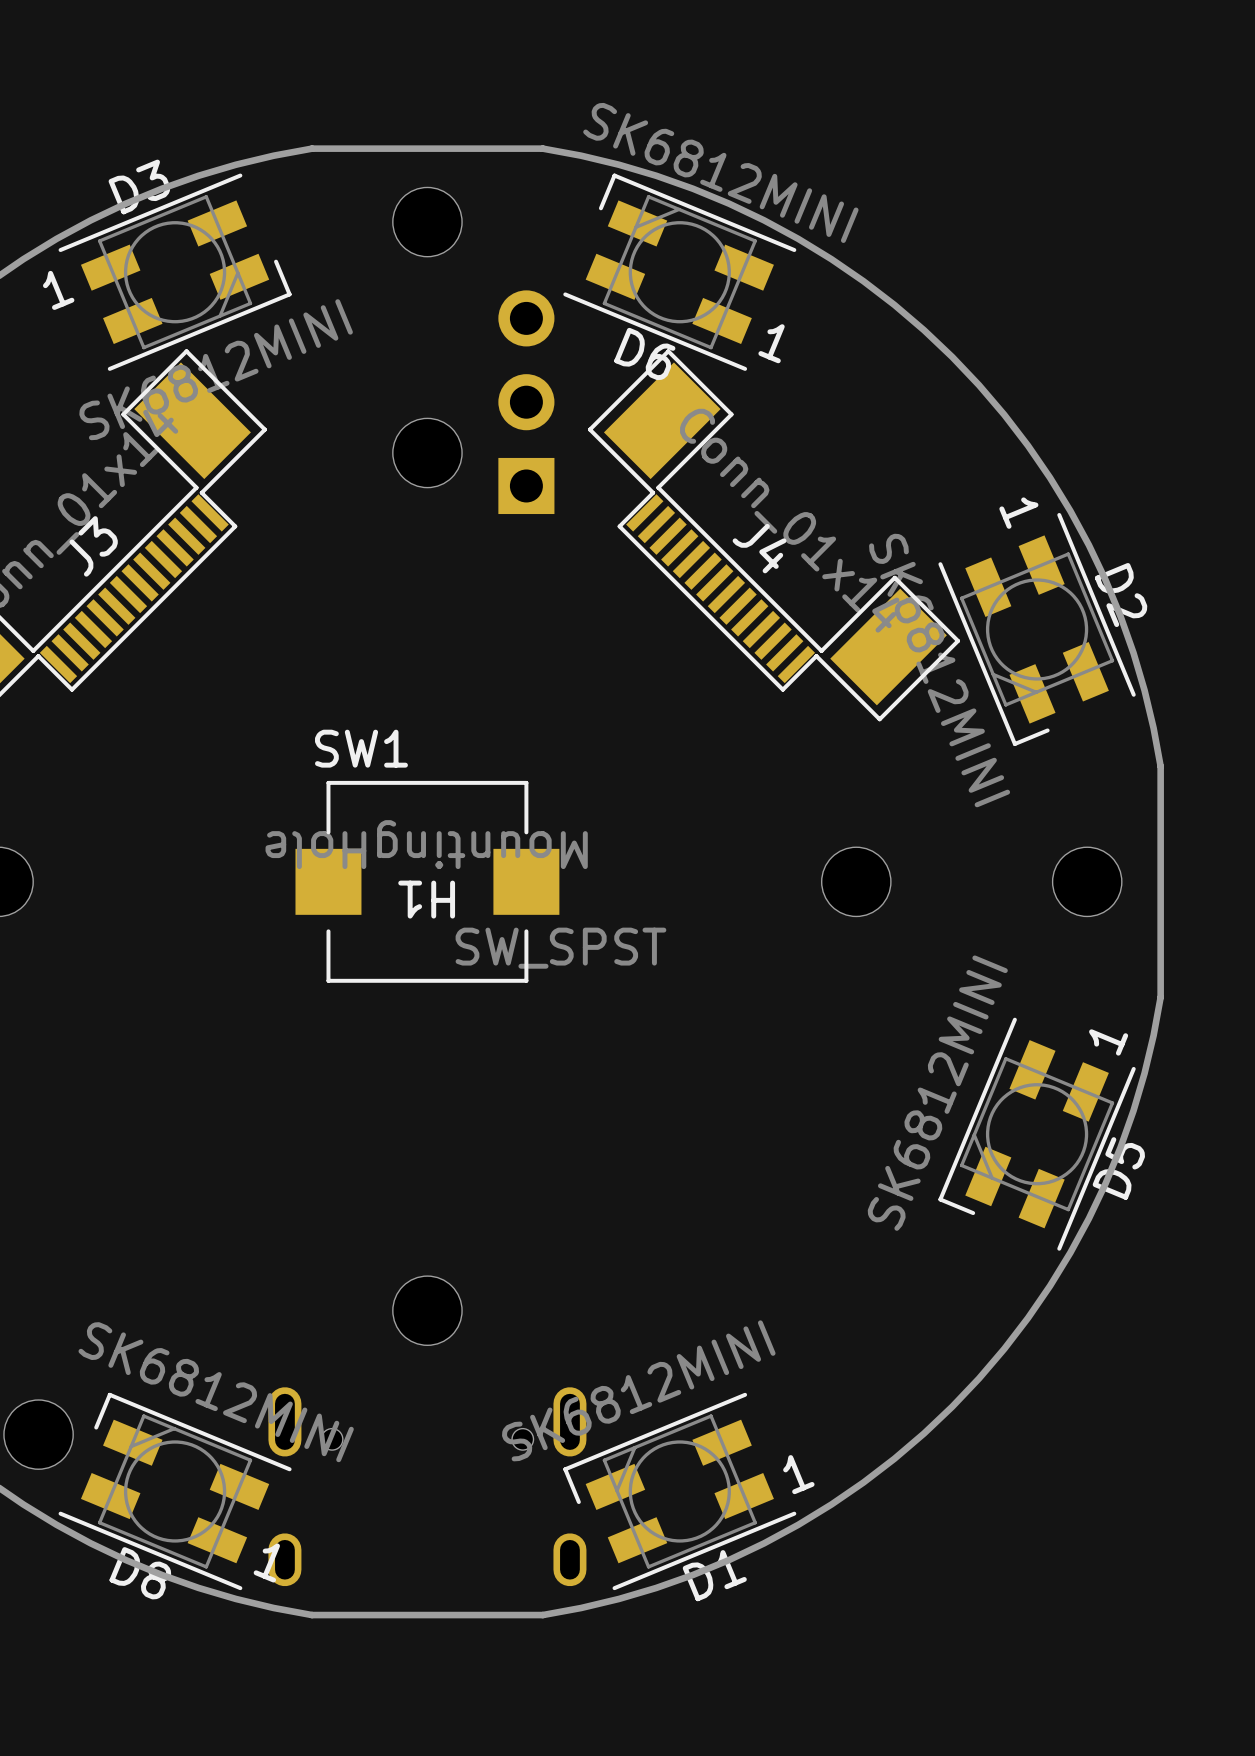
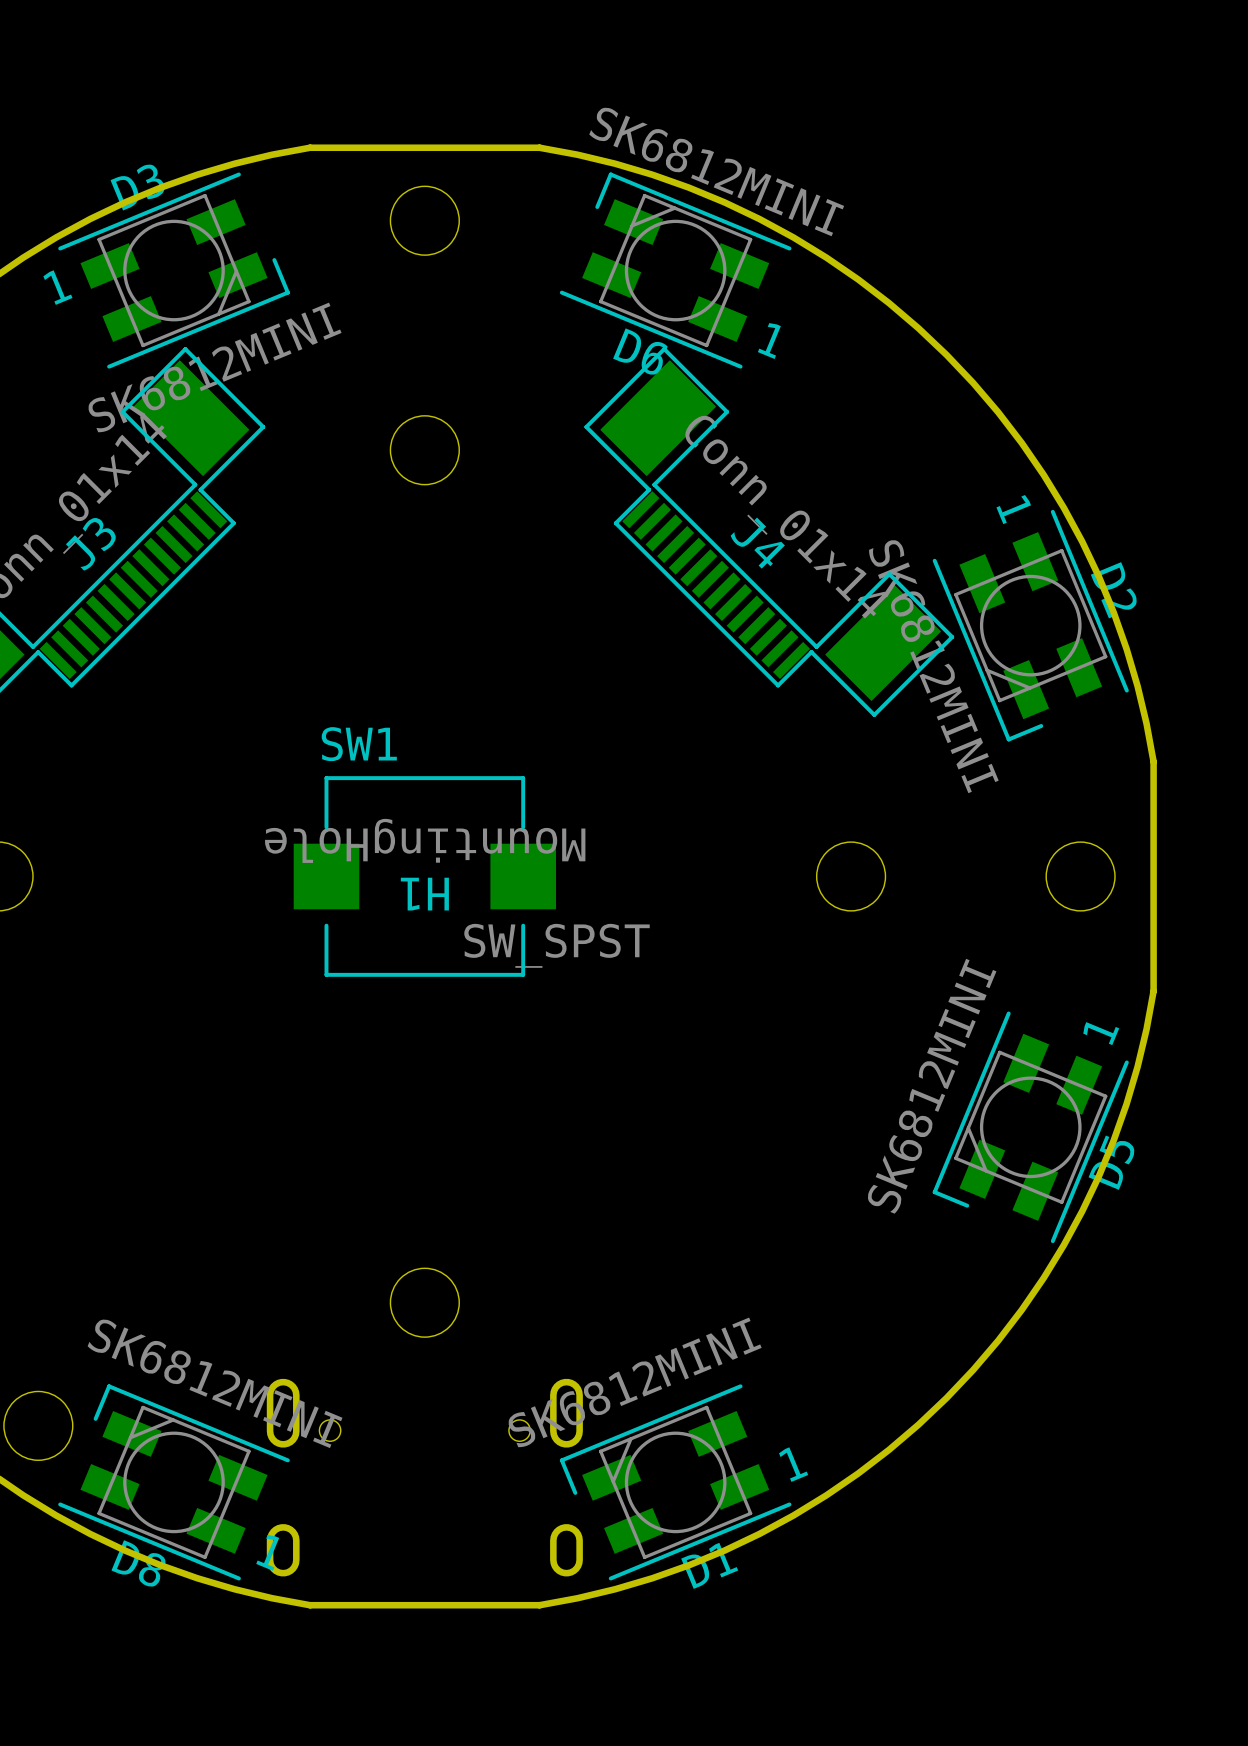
part: (526, 402) -> none

